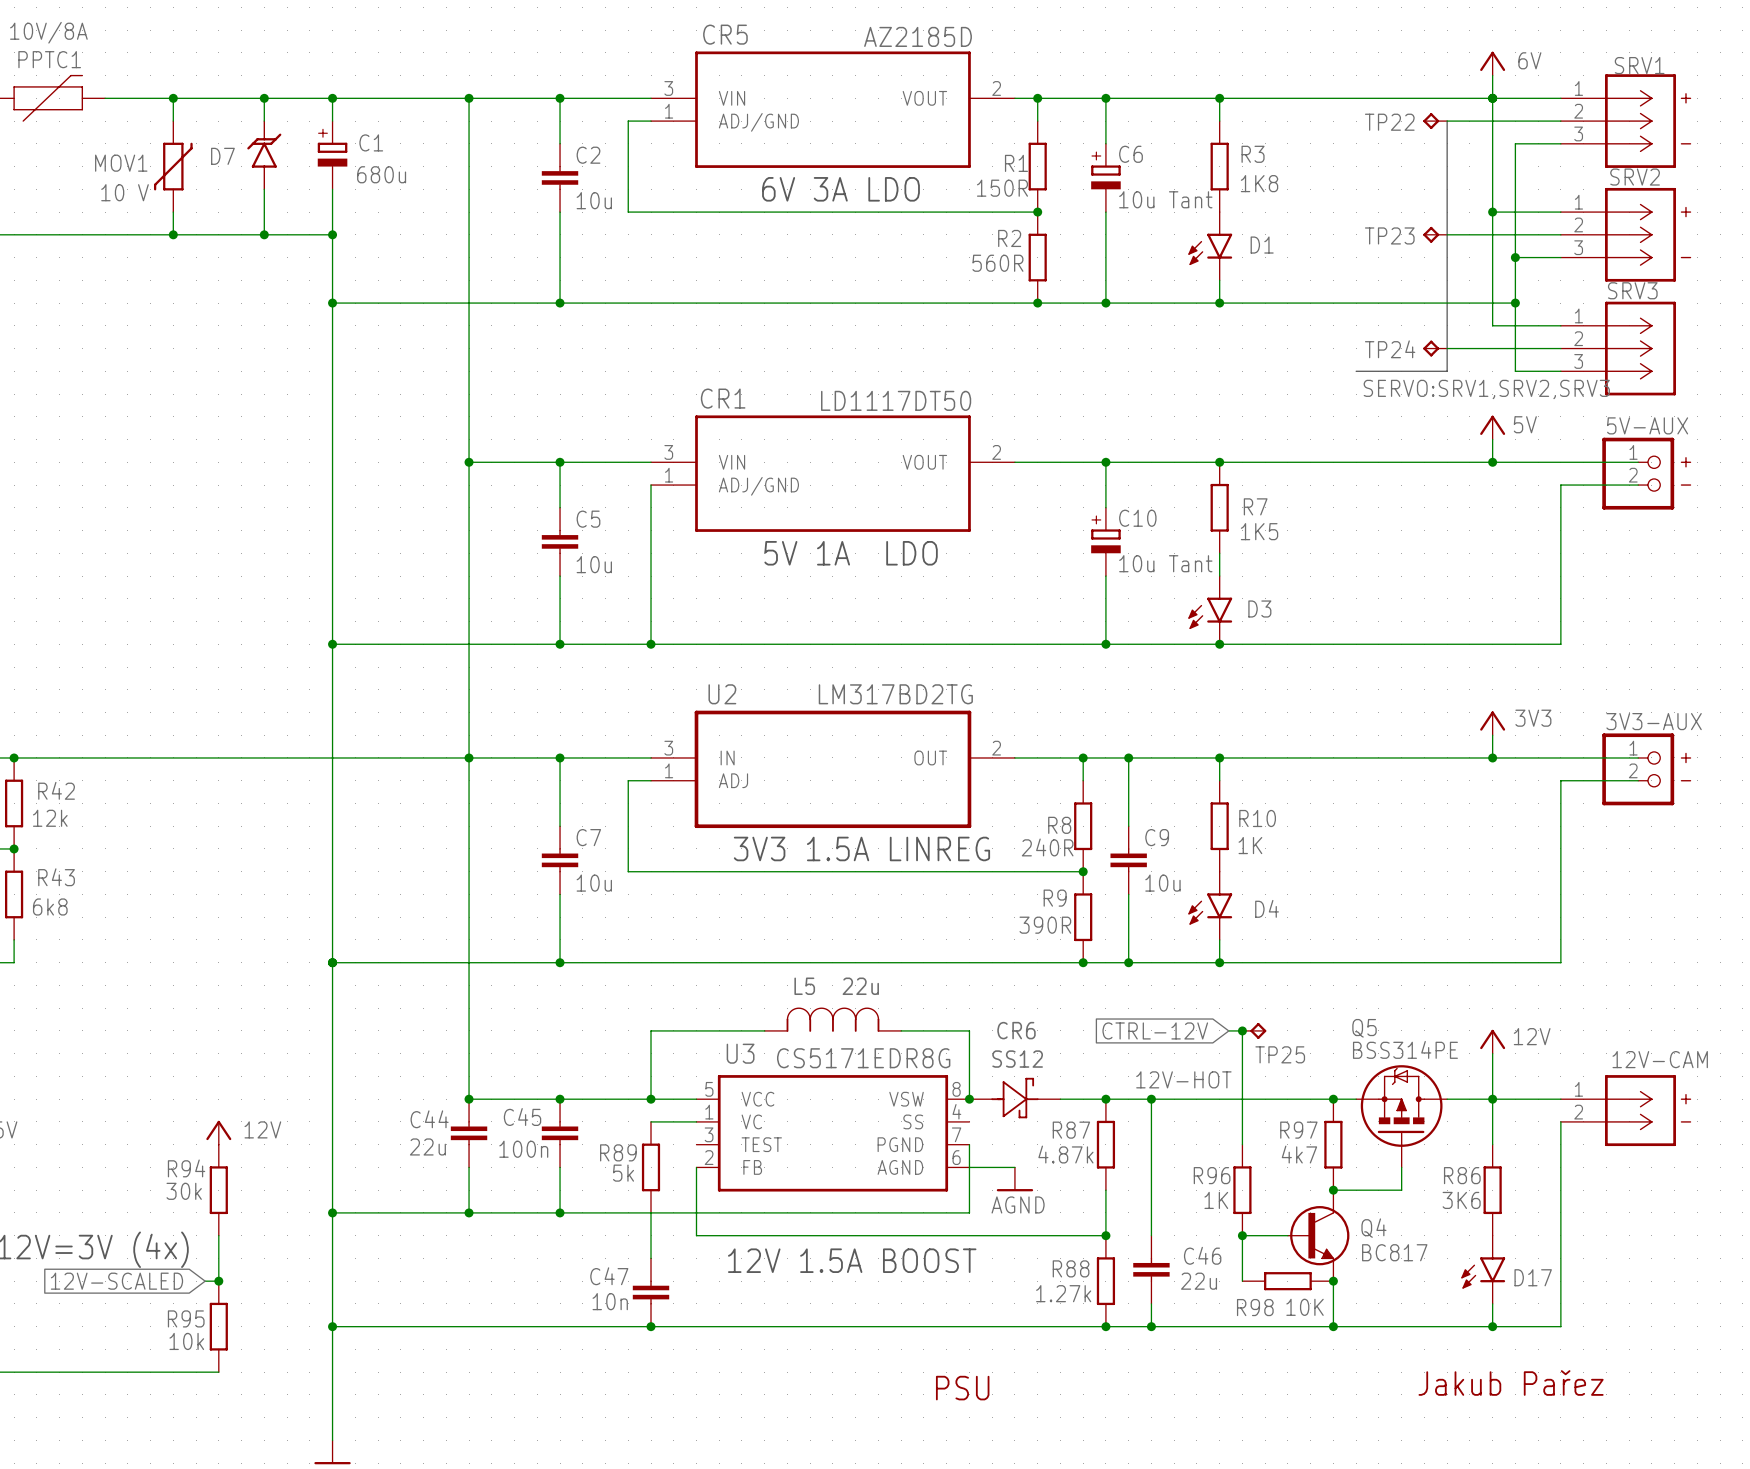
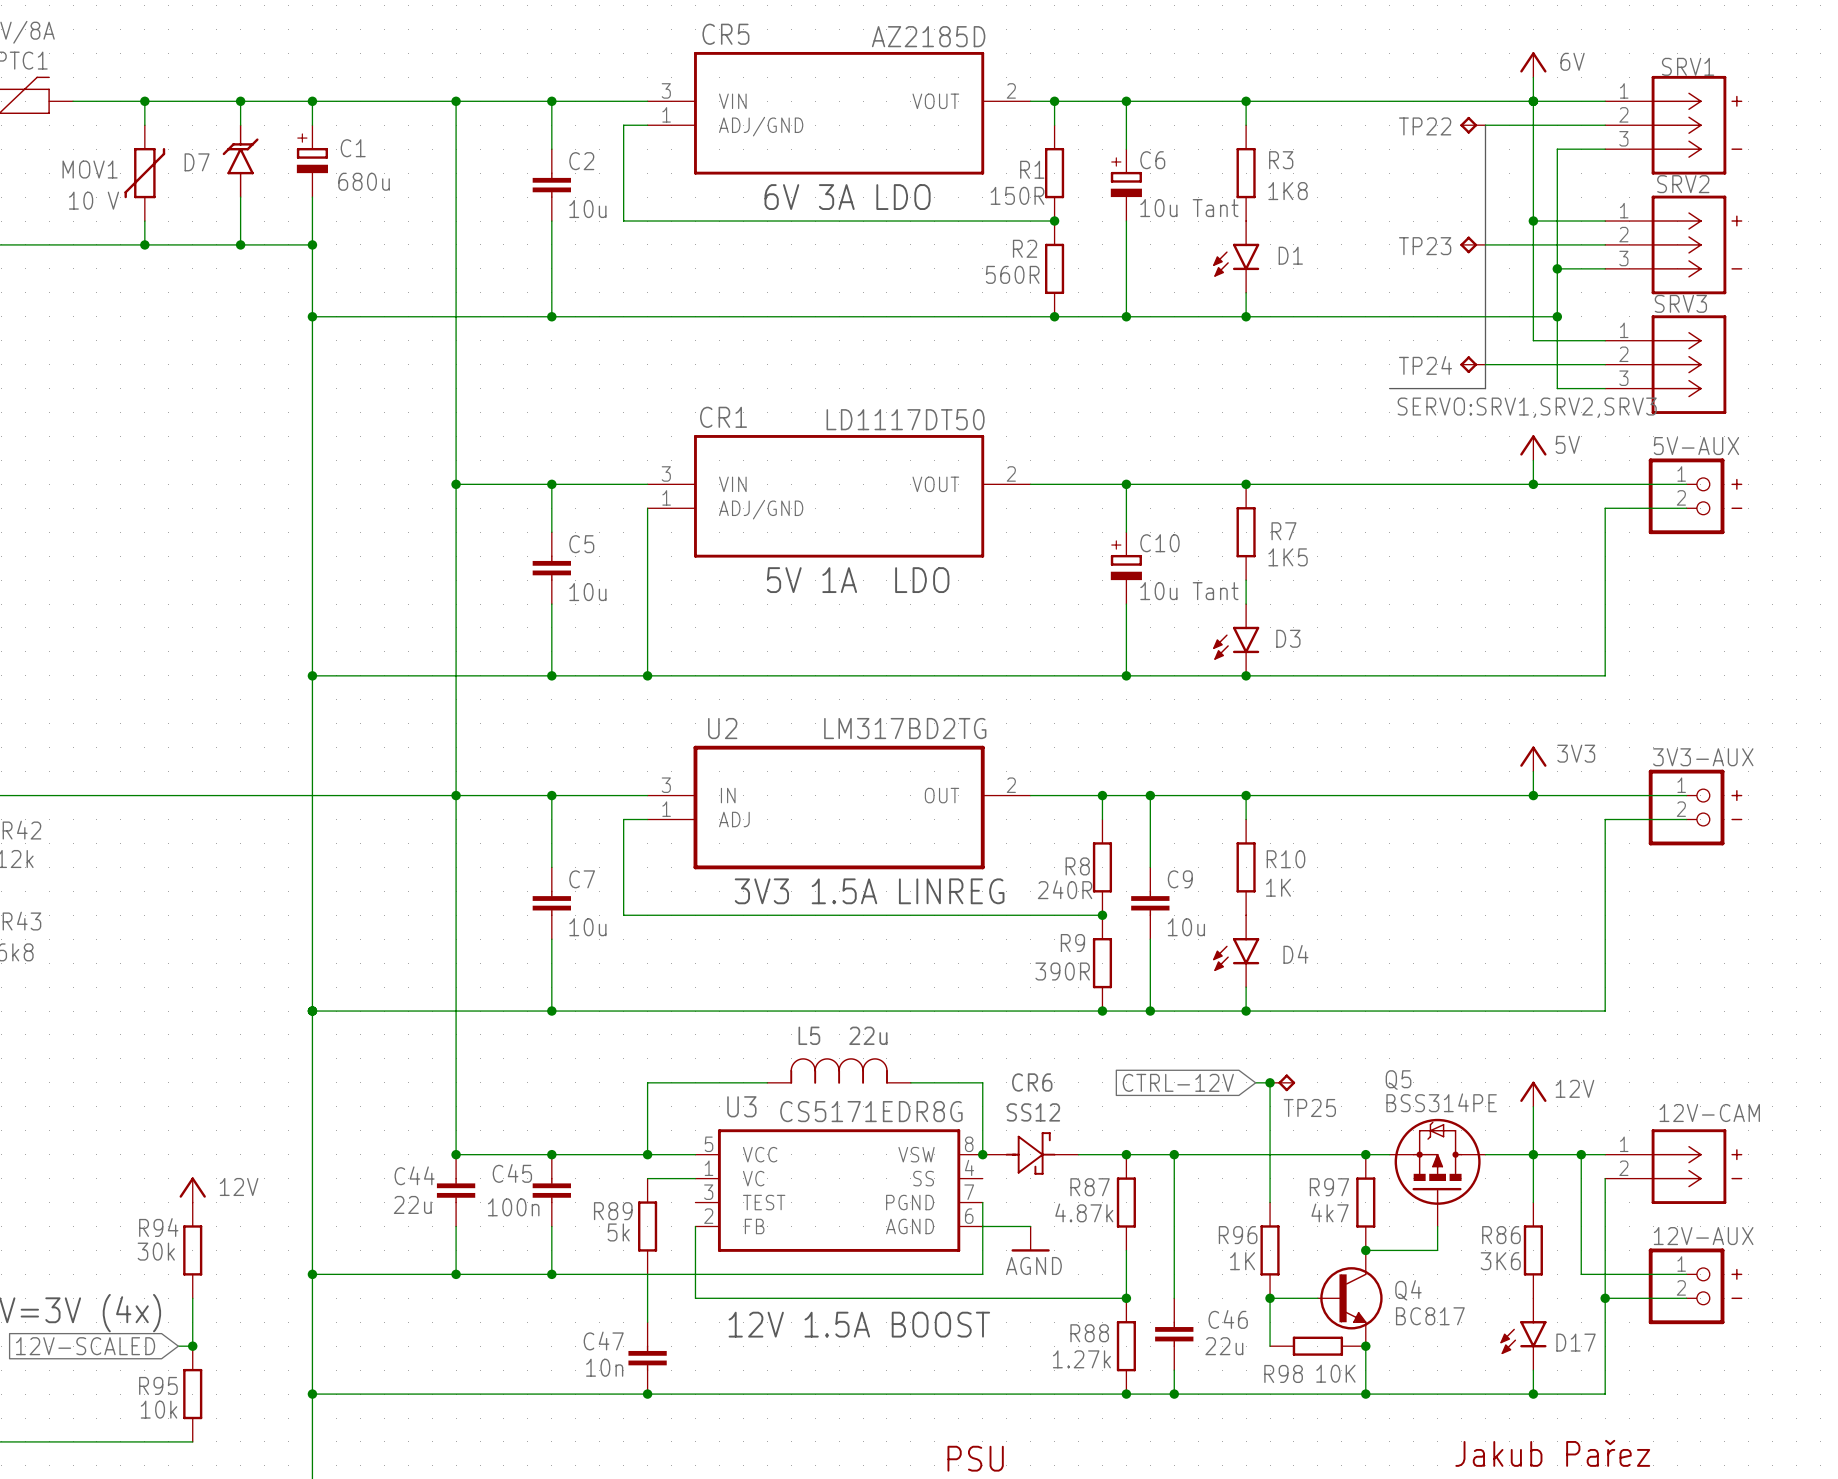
label: 12V-HOT (1183, 1079) -> none
wire: none -> (1581, 1154) (1581, 1274) (1686, 1274)
junction: none -> (1581, 1154)
line: none -> (1736, 1269) (1736, 1279)
line: none -> (1732, 1274) (1741, 1274)
12V-AUX: none -> (1686, 1286)
wire: none -> (1605, 1298) (1686, 1298)
junction: none -> (1605, 1298)
line: none -> (1732, 1298) (1741, 1298)

